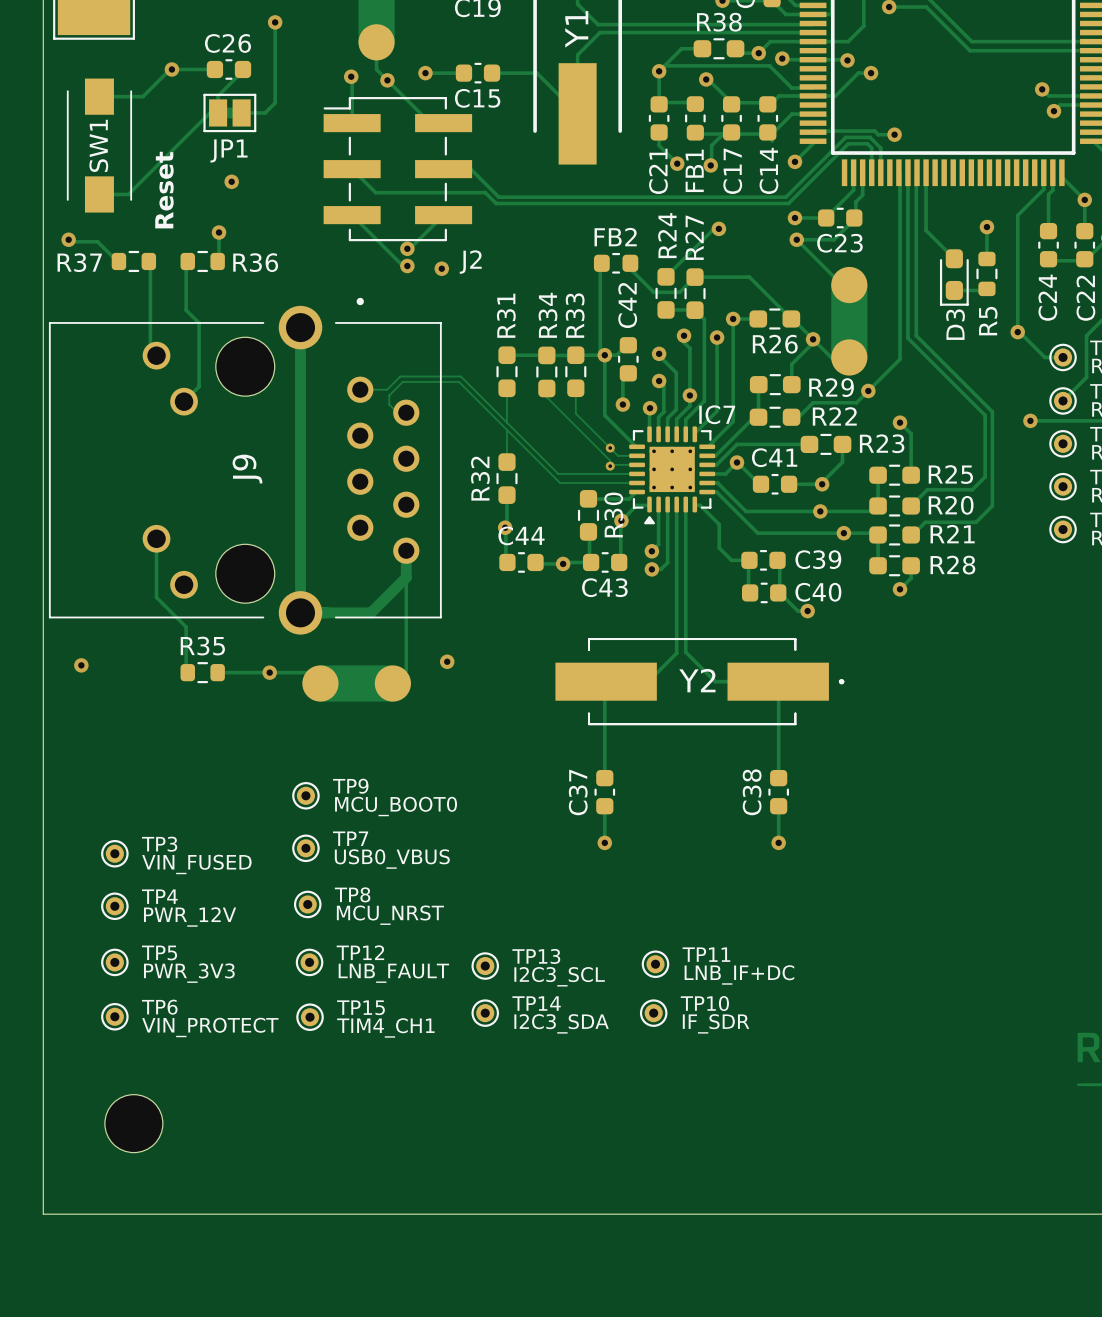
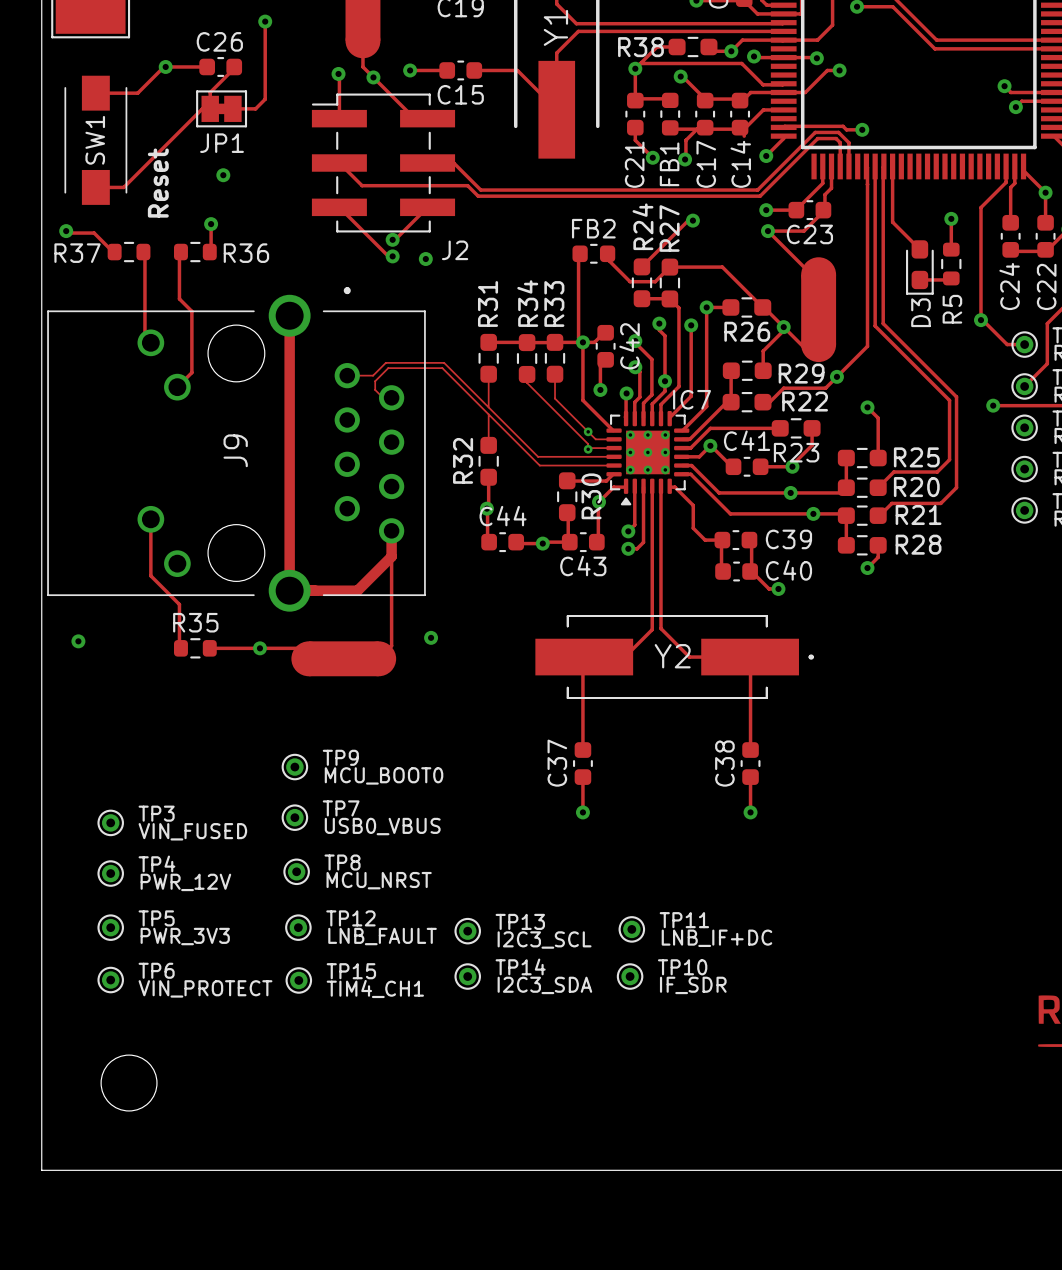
R38 name position: R38 (719, 22) -> R38 (640, 47)
C42 name position: C42 (627, 305) -> C42 (629, 346)
R23 name position: R23 (882, 443) -> R23 (796, 452)

